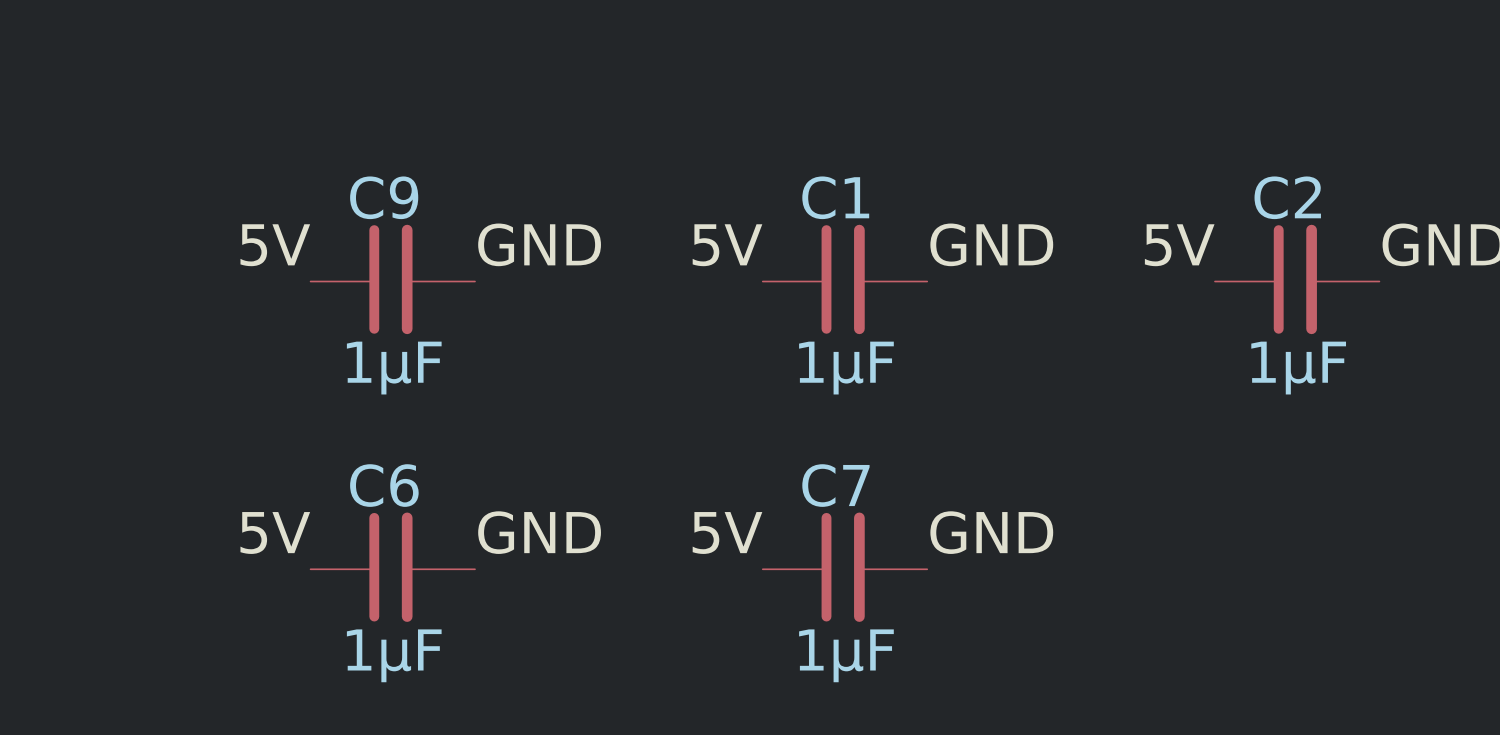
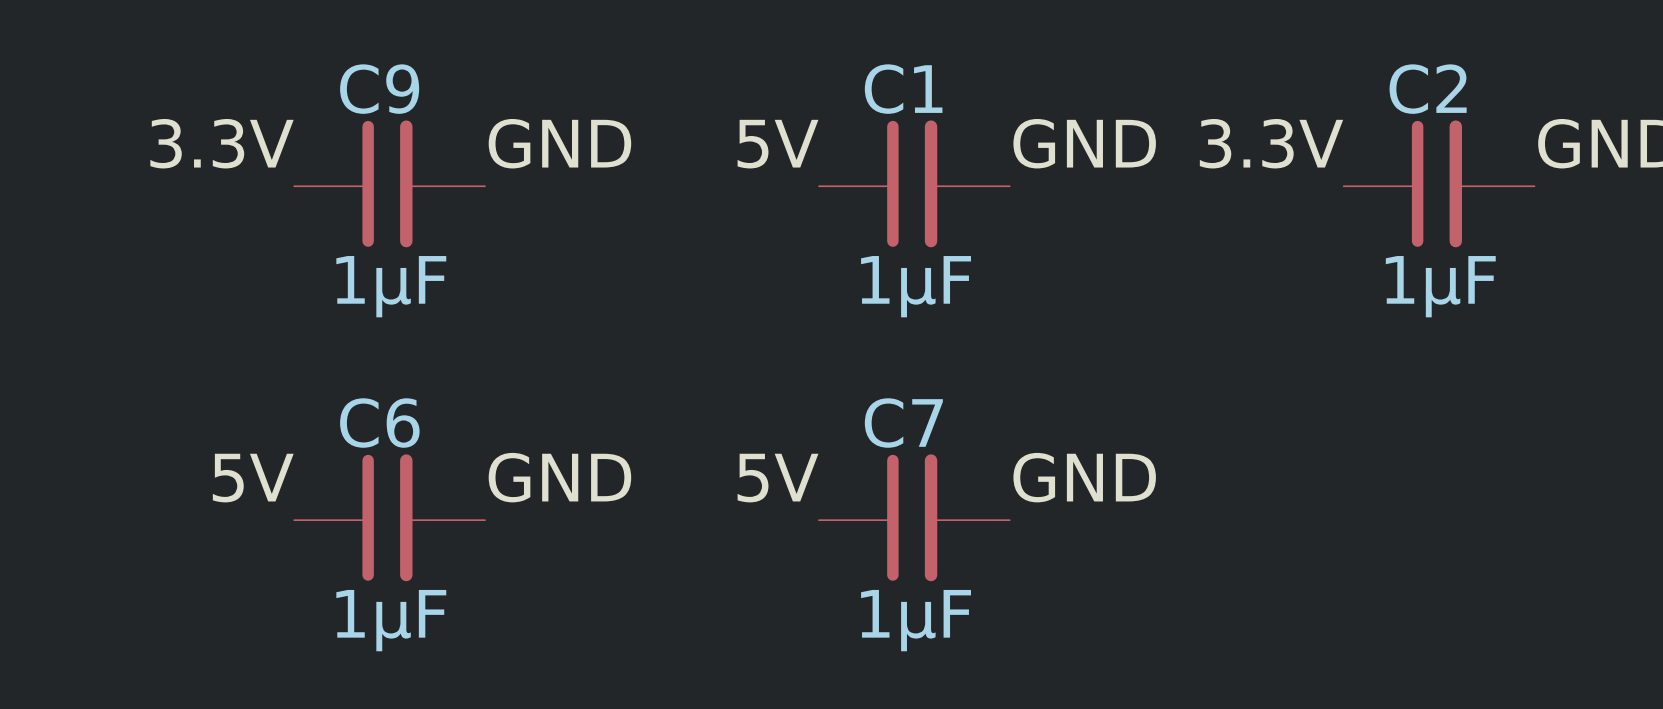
label: 5V (275, 245) -> 3.3V (222, 143)
label: 5V (1179, 245) -> 3.3V (1271, 143)

